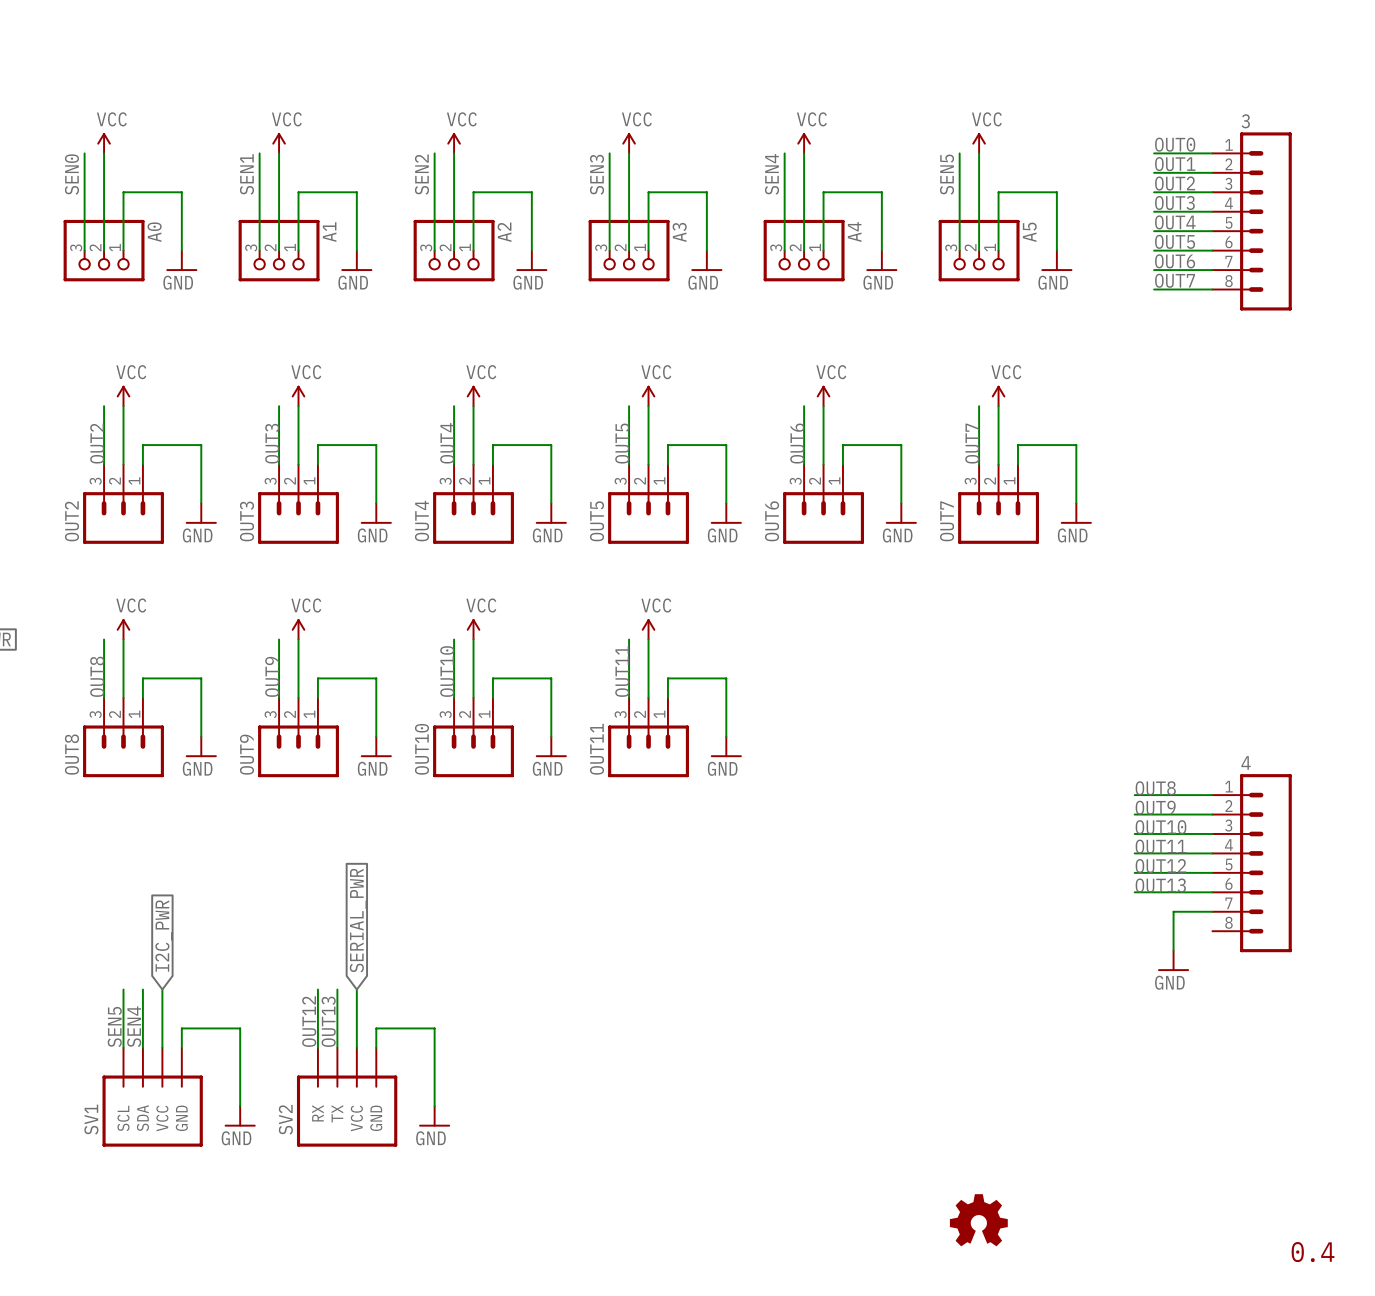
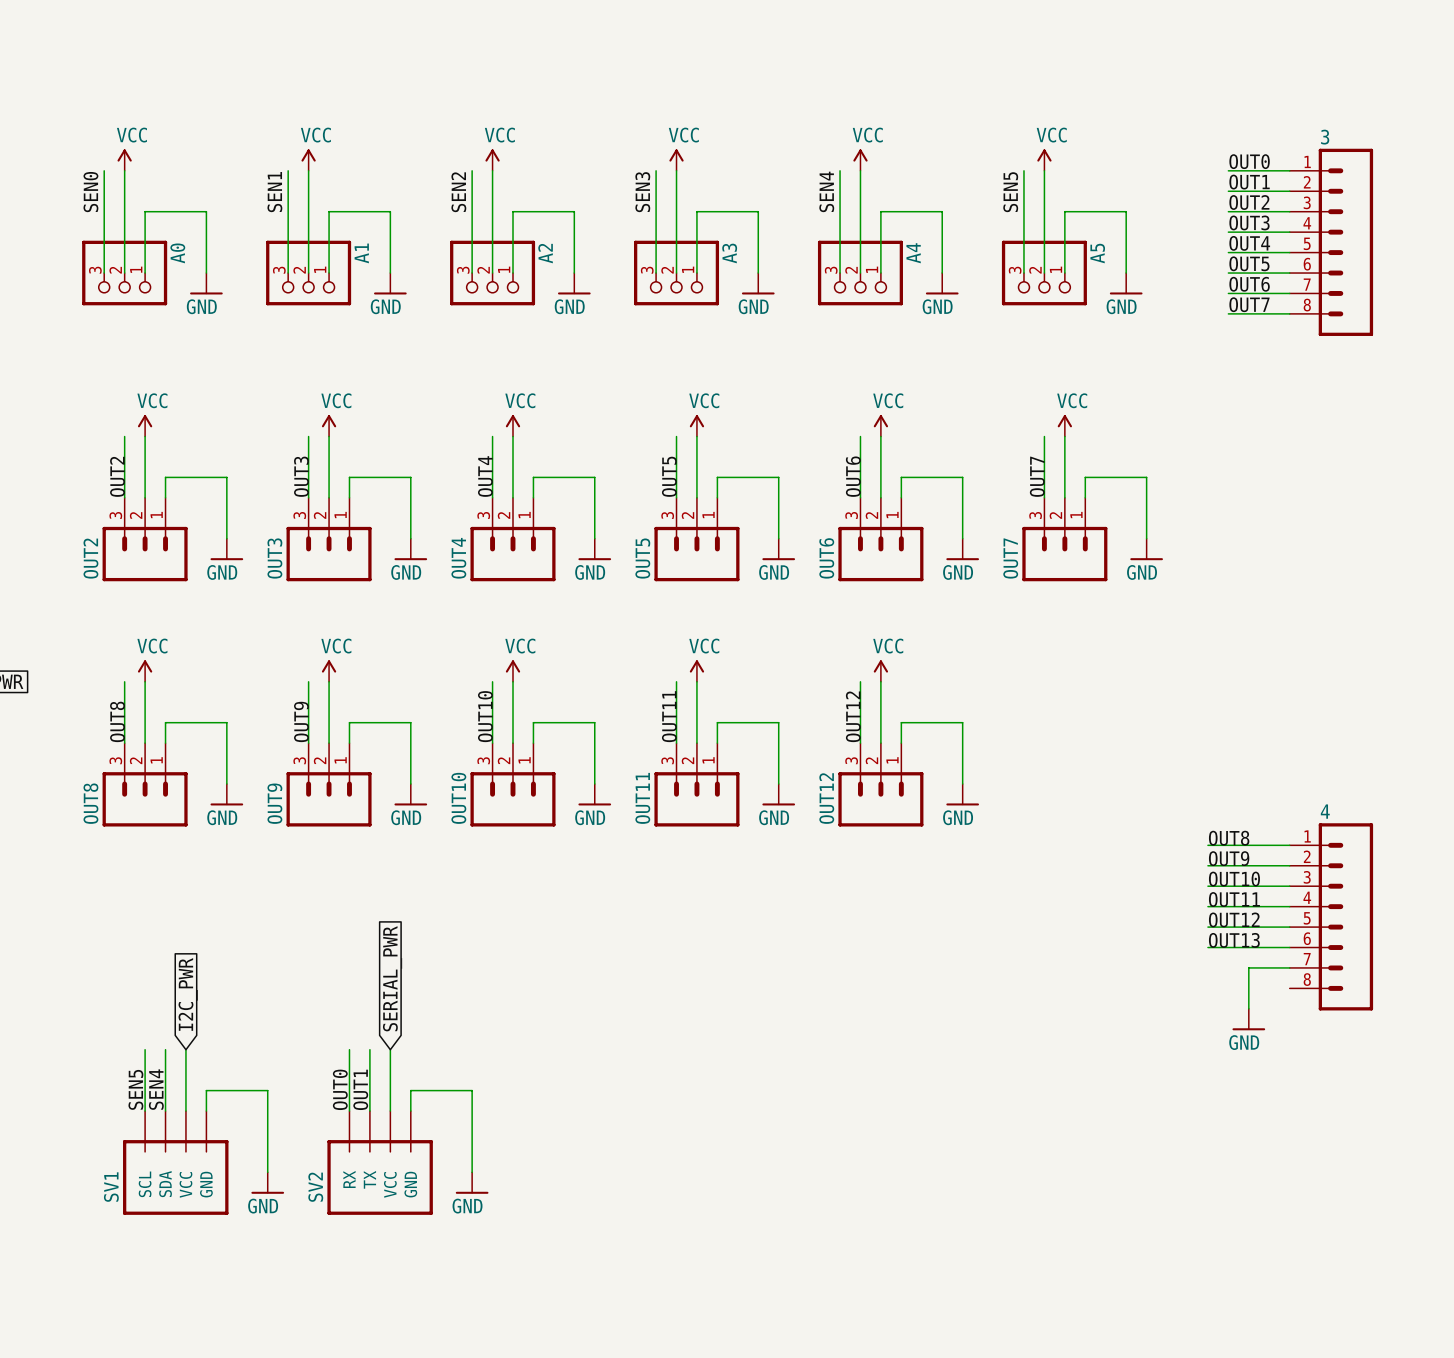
power symbol: none -> VCC (880, 671)
wire: none -> (860, 681) (860, 743)
wire: none -> (880, 681) (880, 743)
label: none -> OUT12 (853, 716)
wire: none -> (901, 743) (901, 722) (962, 722) (962, 784)
OUT12: none -> (880, 784)
power symbol: none -> GND (962, 794)
label: OUT12 (309, 1021) -> OUT0 (340, 1089)
label: OUT13 (328, 1021) -> OUT1 (360, 1089)
part: (978, 1220) -> none
text: 0.4 (1313, 1252) -> none

